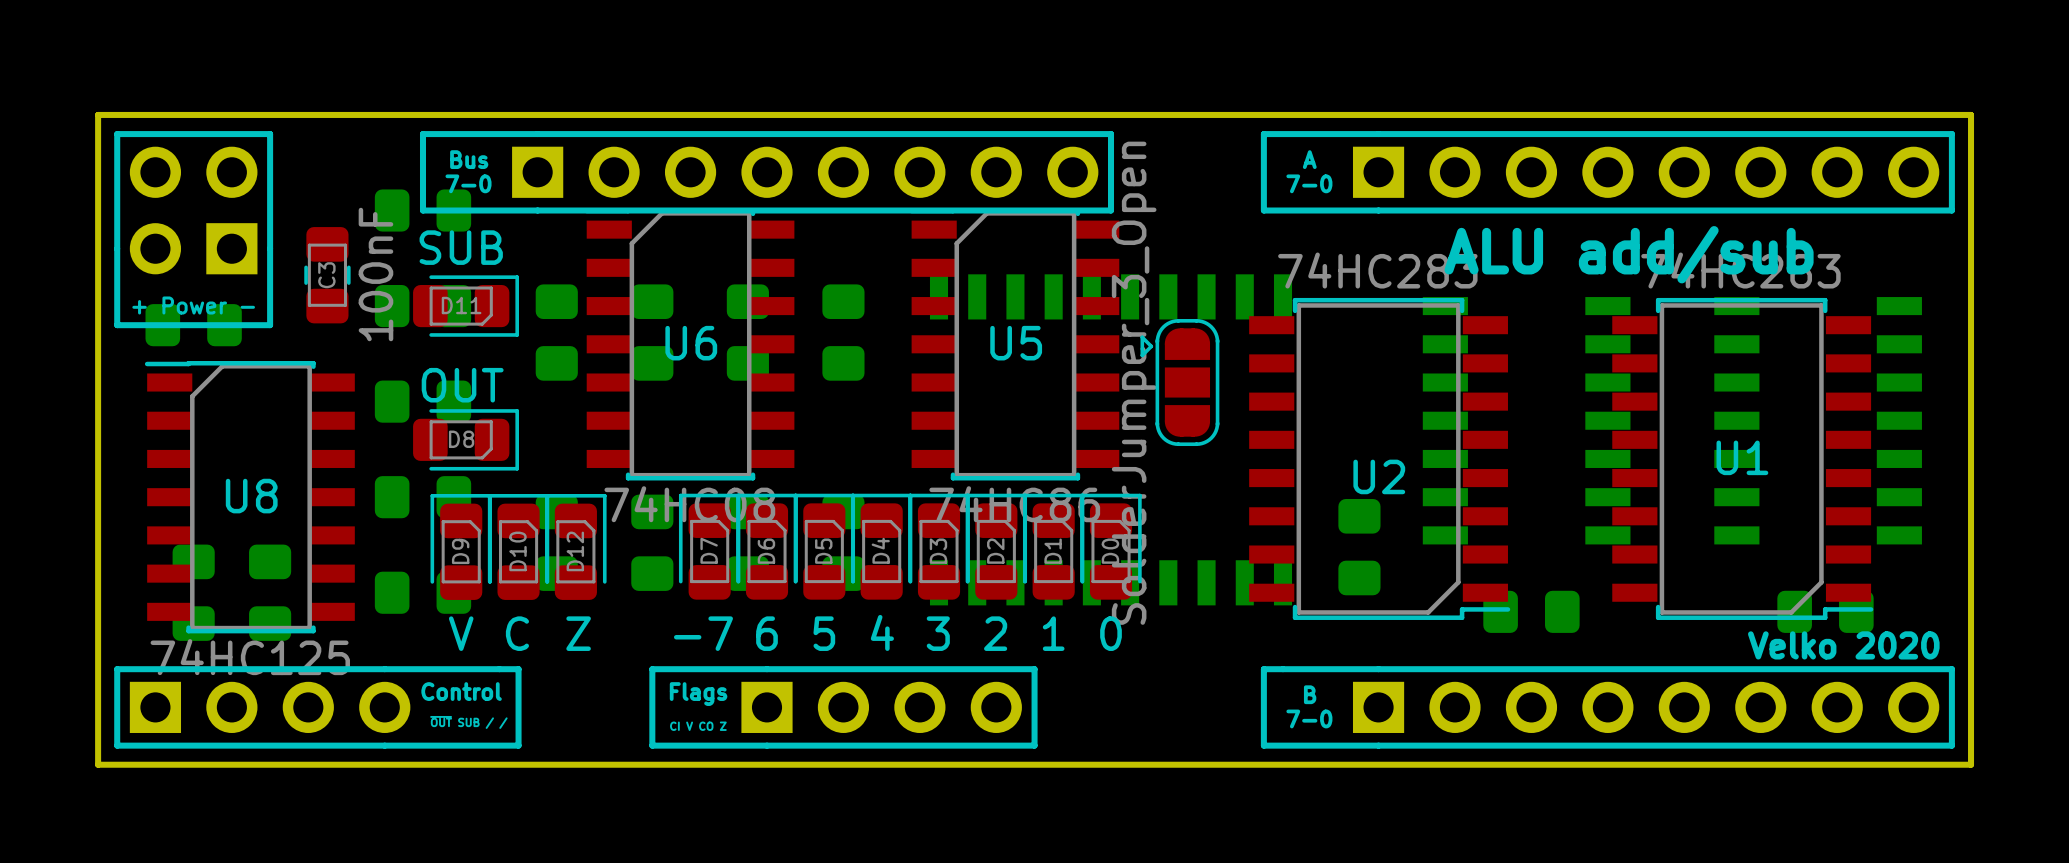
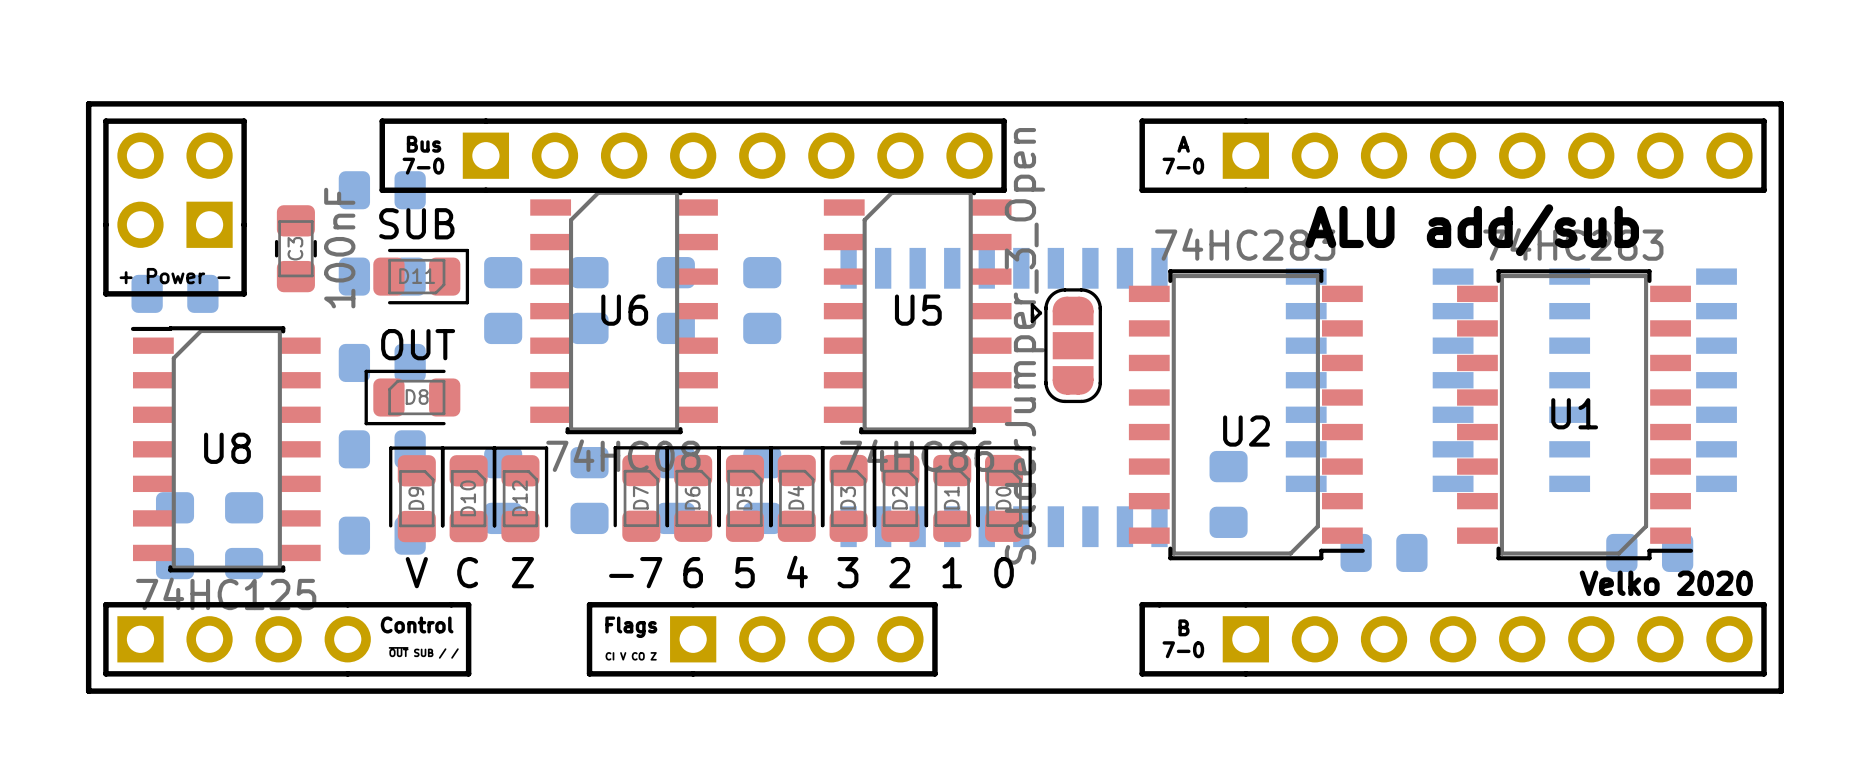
D8 rotation: 0° (466, 439) -> 180° (412, 397)

